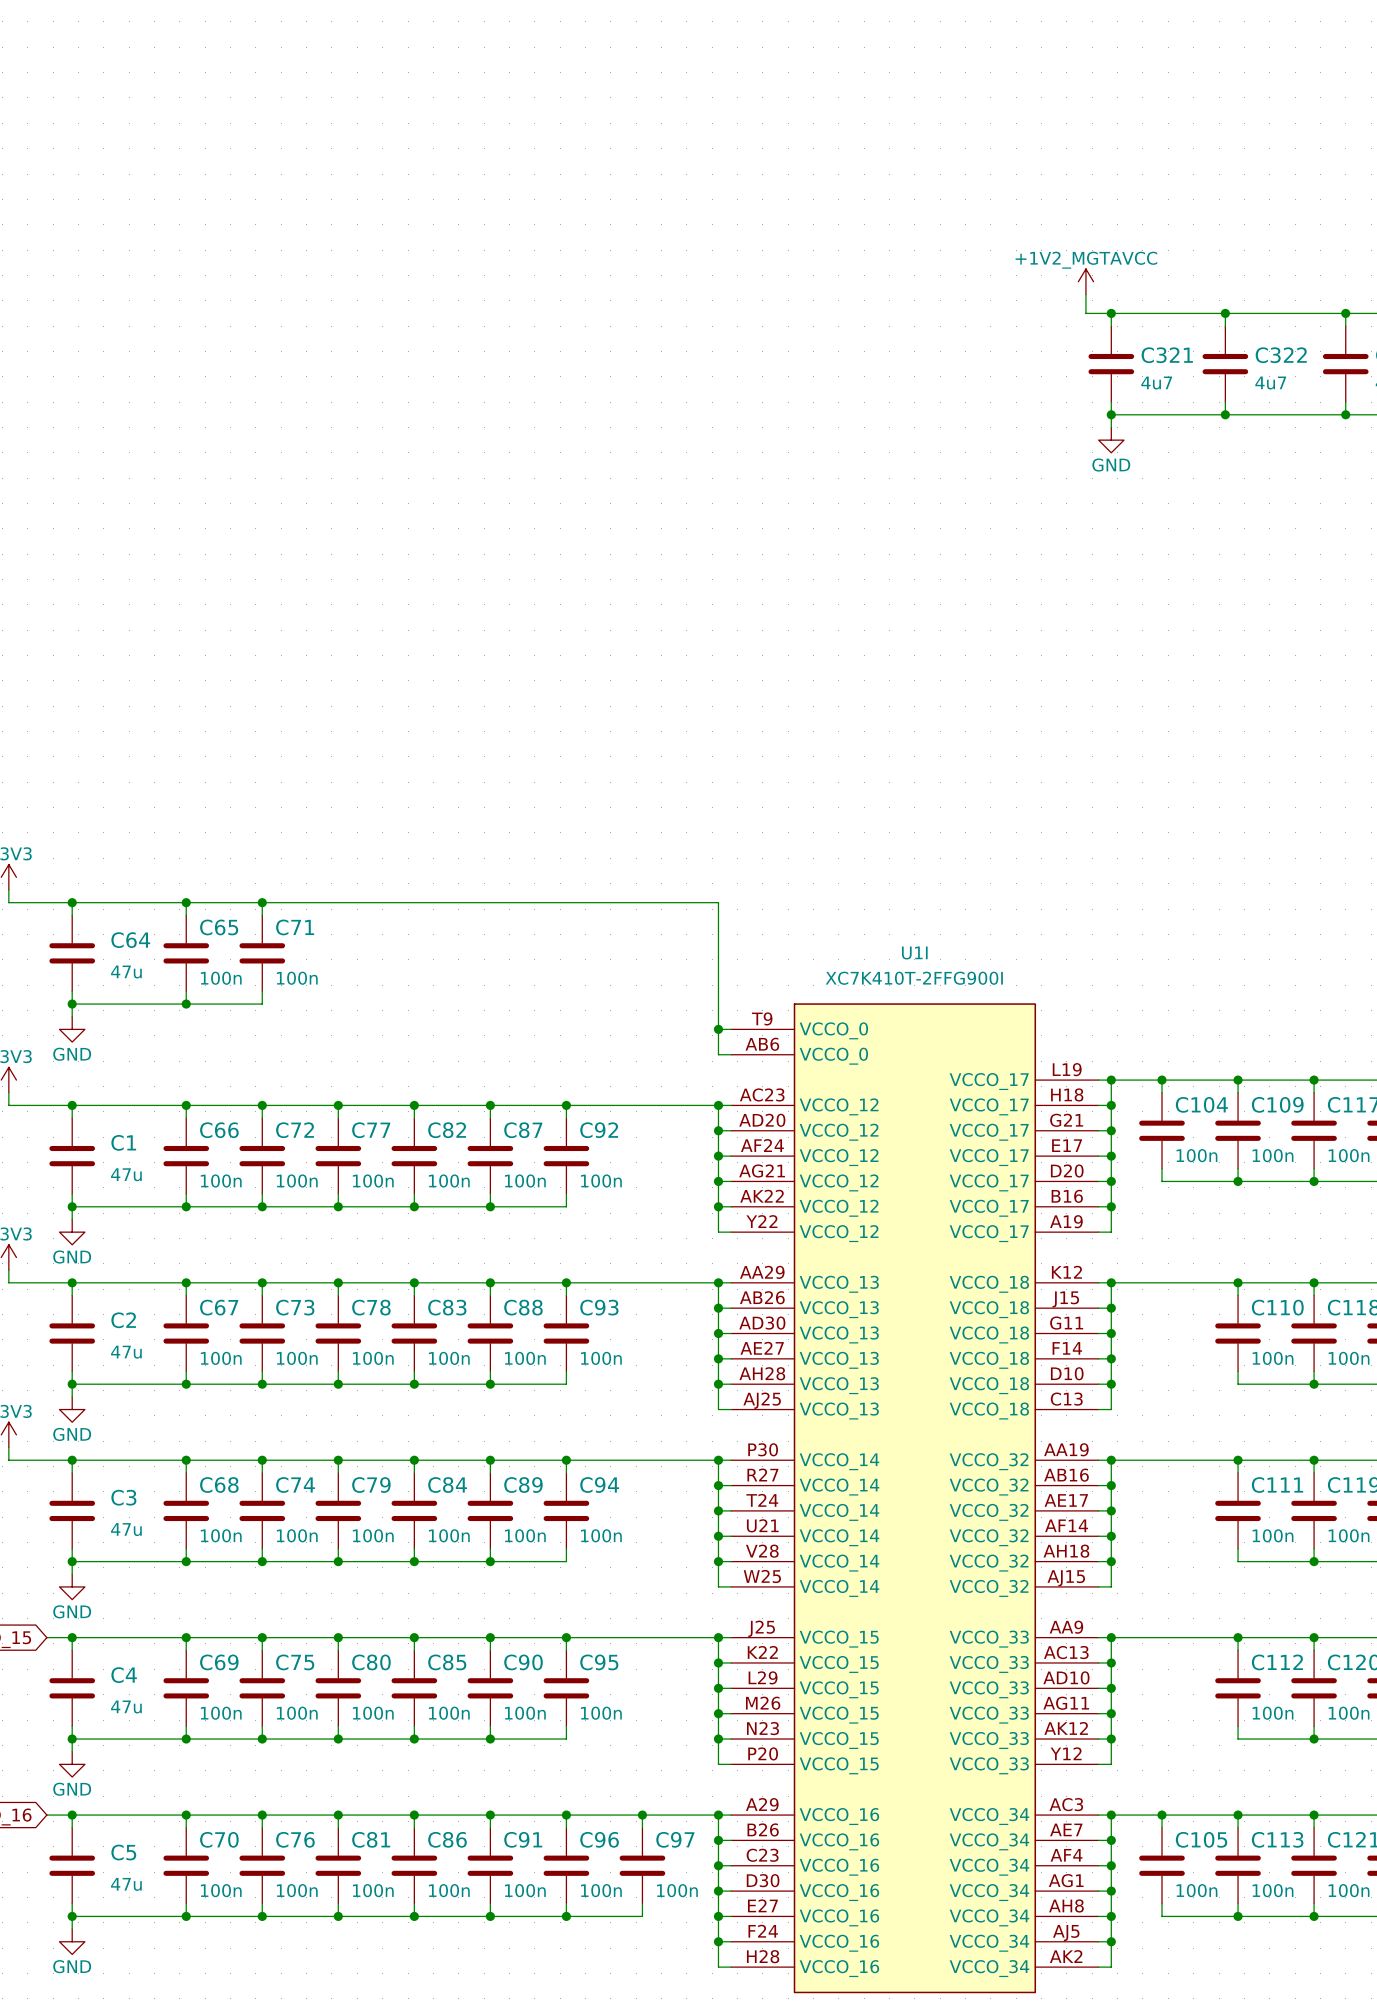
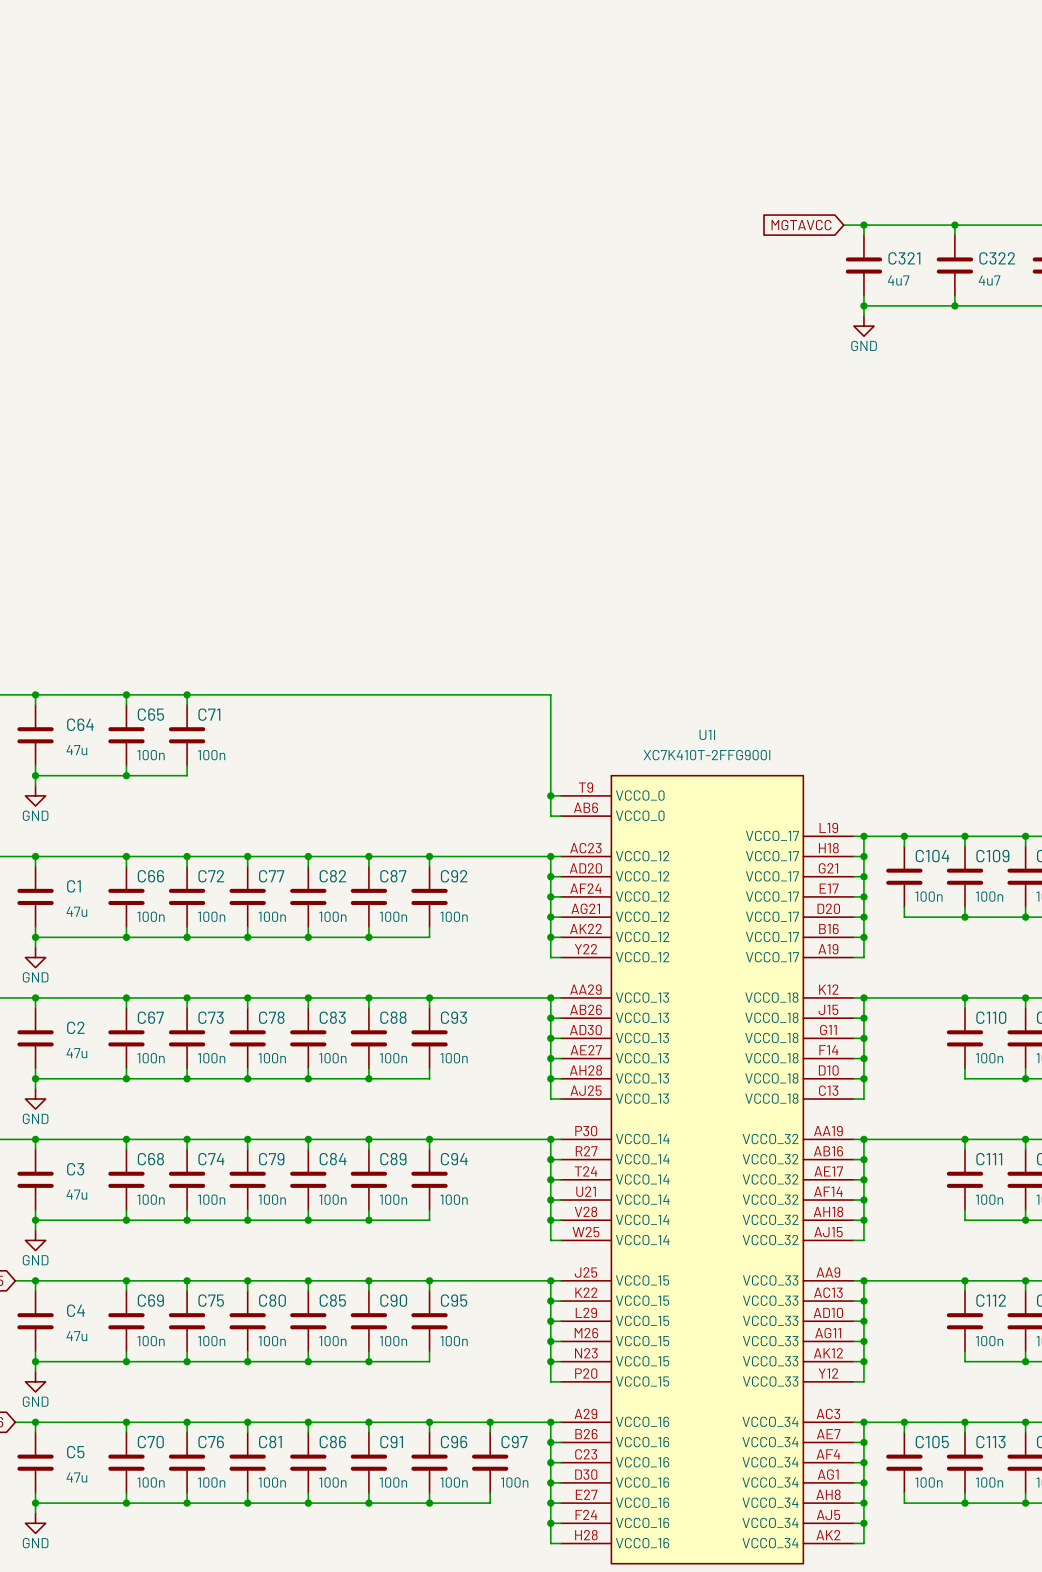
power symbol: +1V2_MGTAVCC (1085, 281) -> none
wire: (1085, 294) (1085, 313) -> none
global label: none -> MGTAVCC (801, 225)

